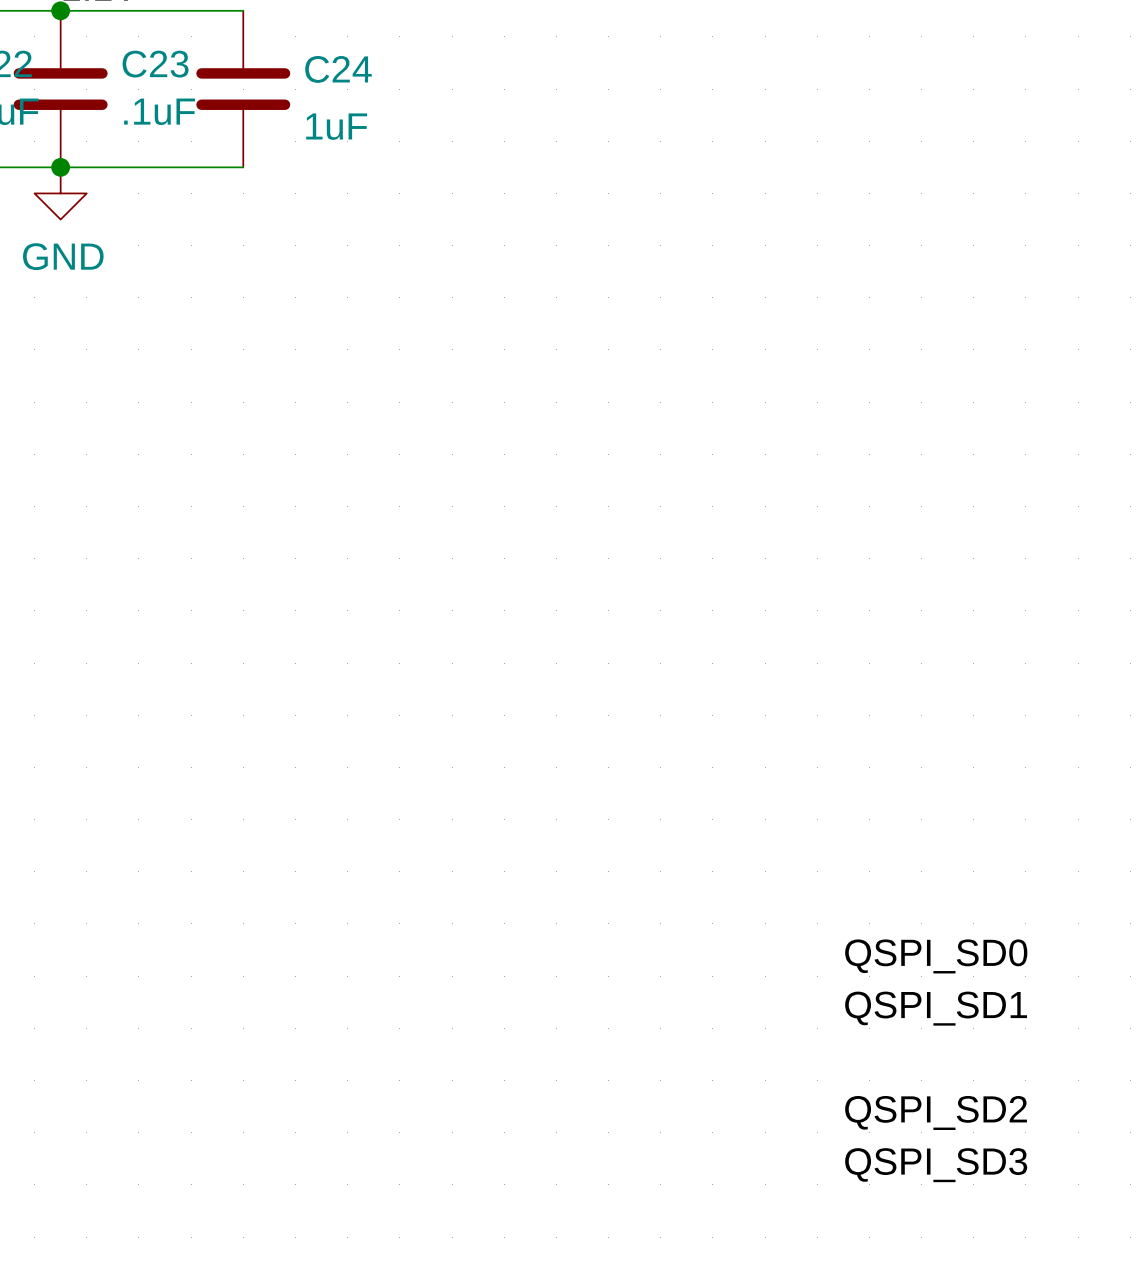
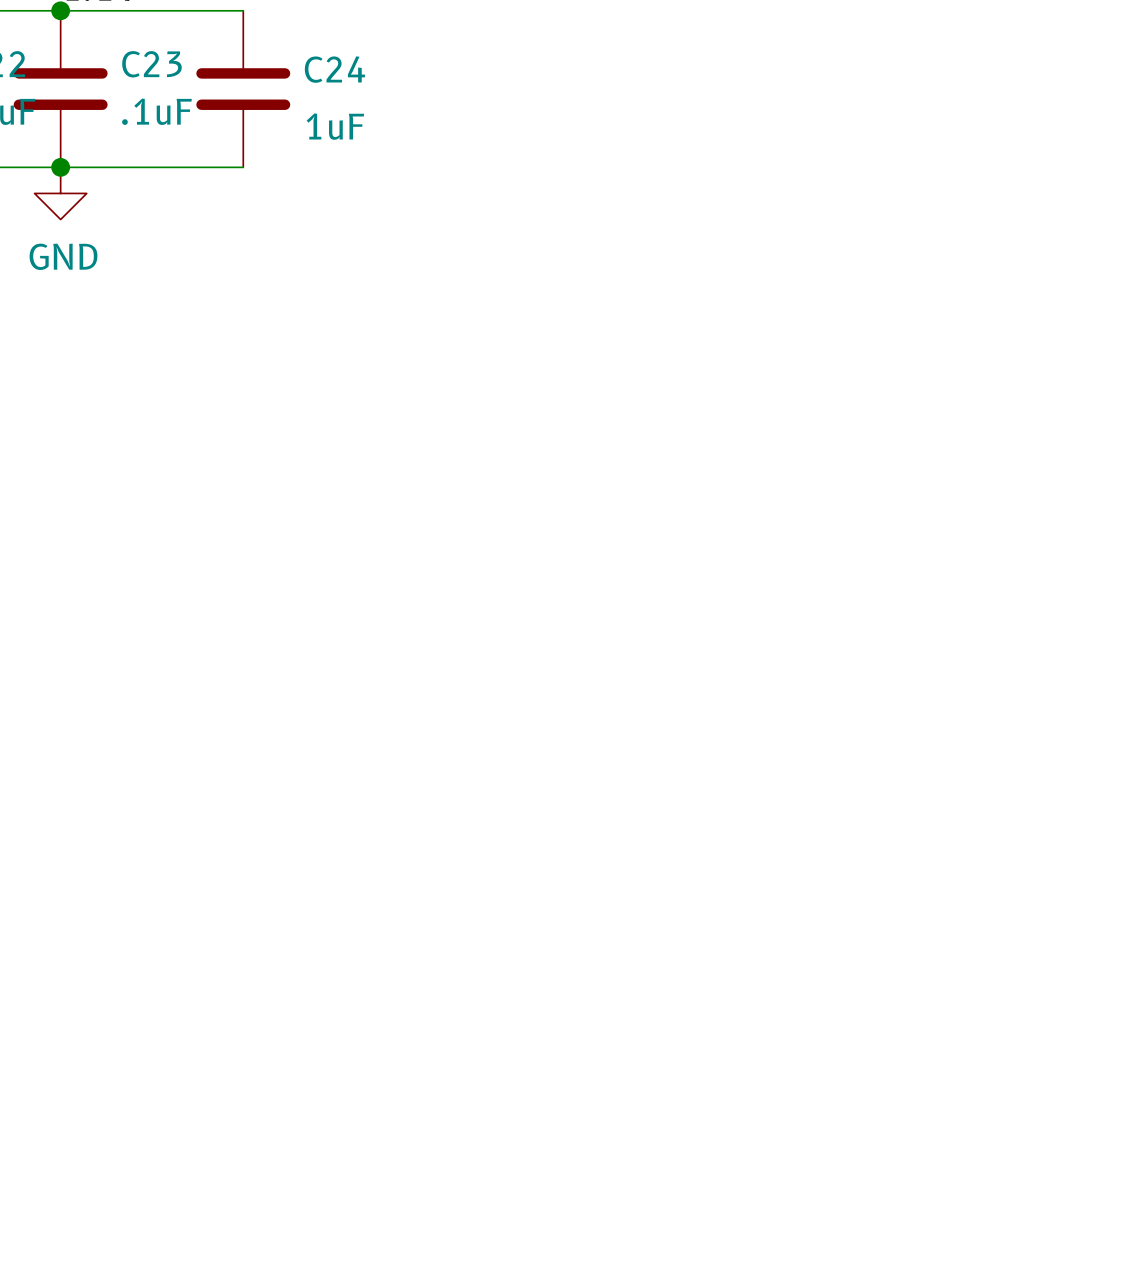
label: QSPI_SD0 (936, 956) -> none
label: QSPI_SD1 (936, 1008) -> none
label: QSPI_SD2 (936, 1112) -> none
label: QSPI_SD3 (936, 1165) -> none

